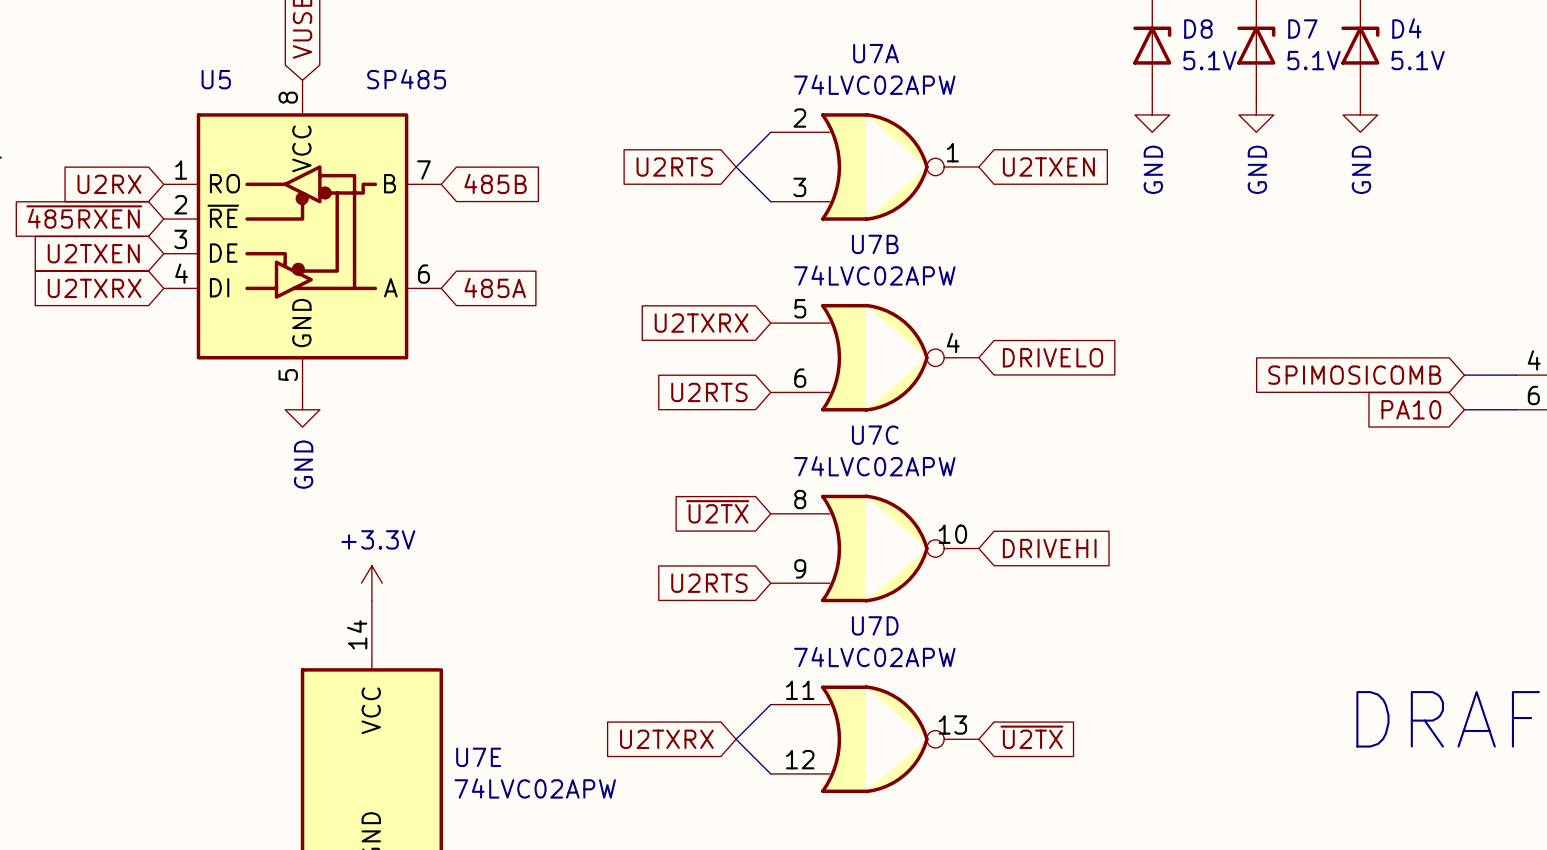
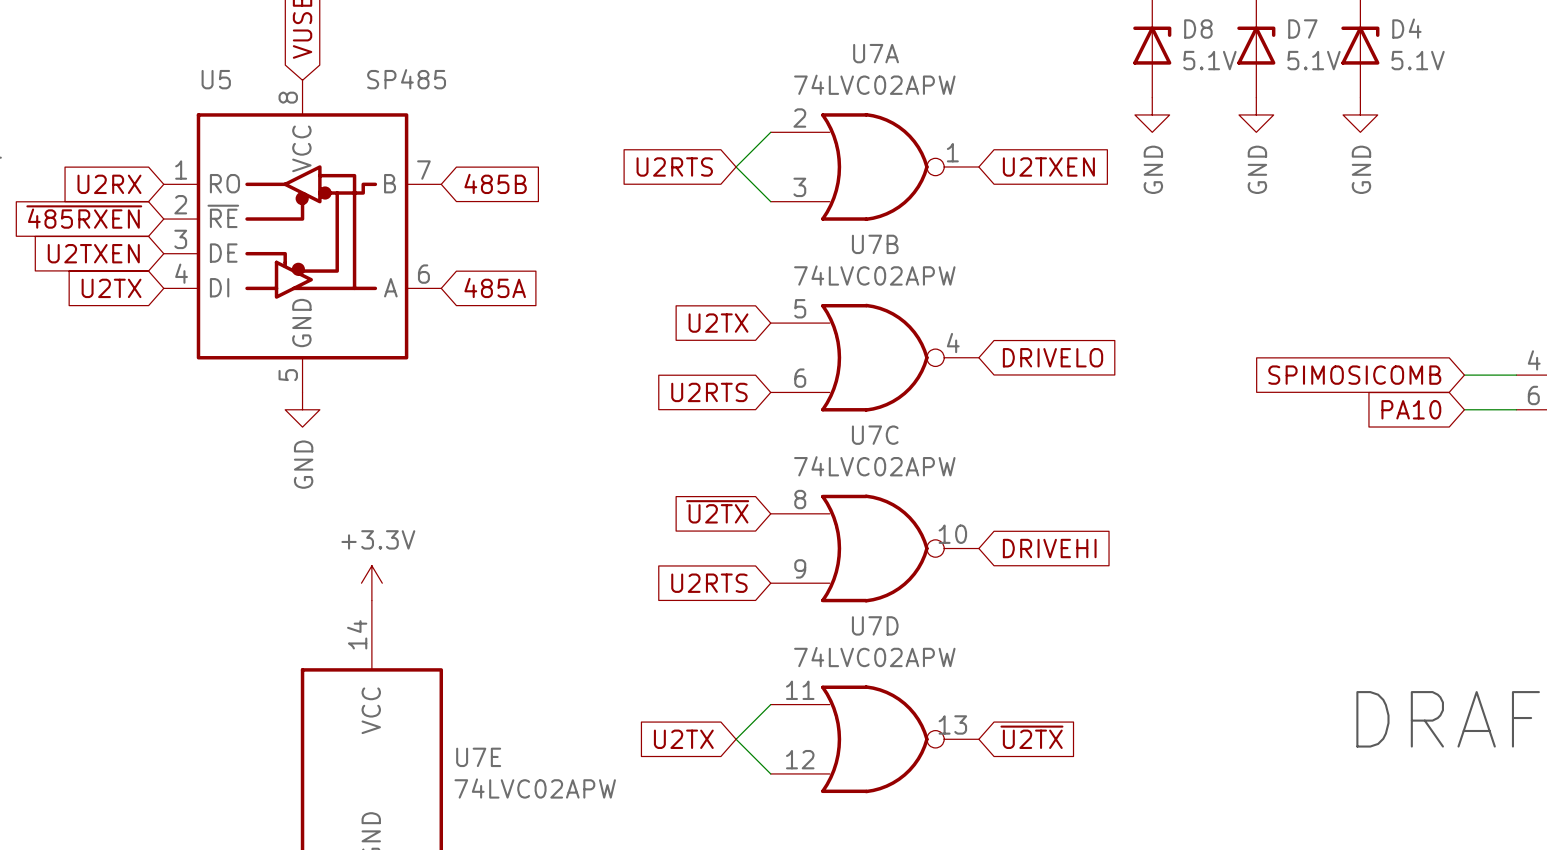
global label: U2TXRX (94, 288) -> U2TX (111, 288)
global label: U2TXRX (701, 323) -> U2TX (718, 323)
global label: U2TXRX (666, 739) -> U2TX (683, 739)

